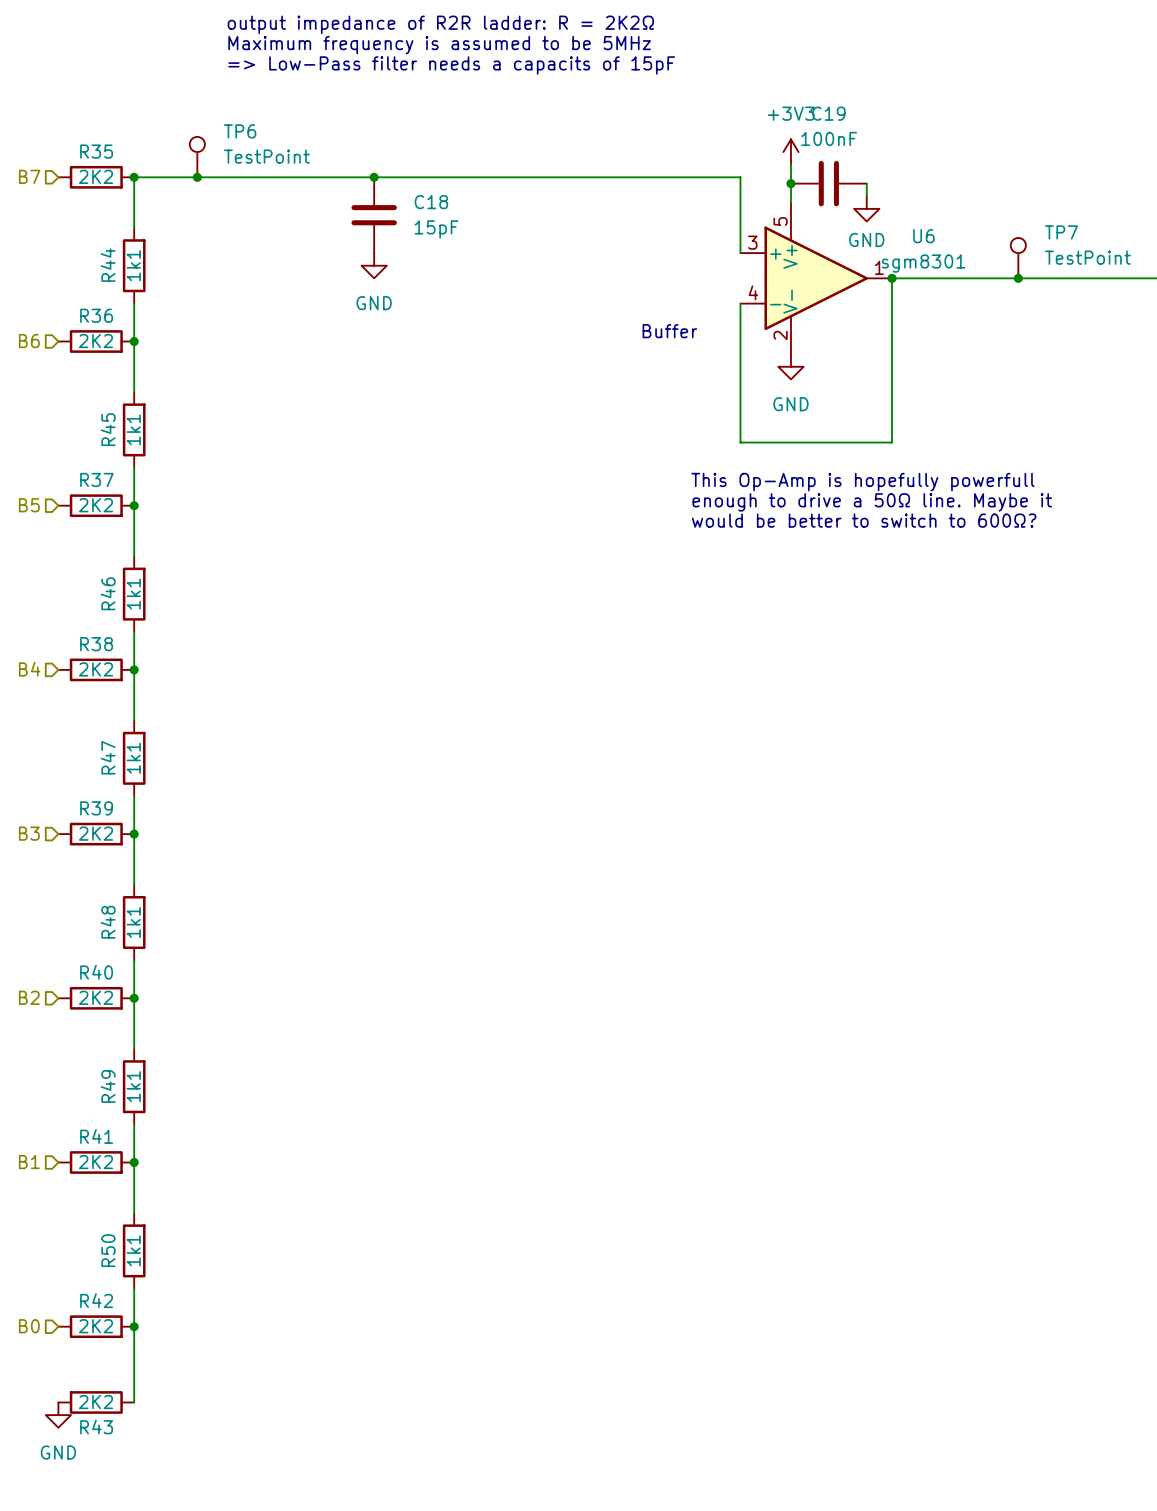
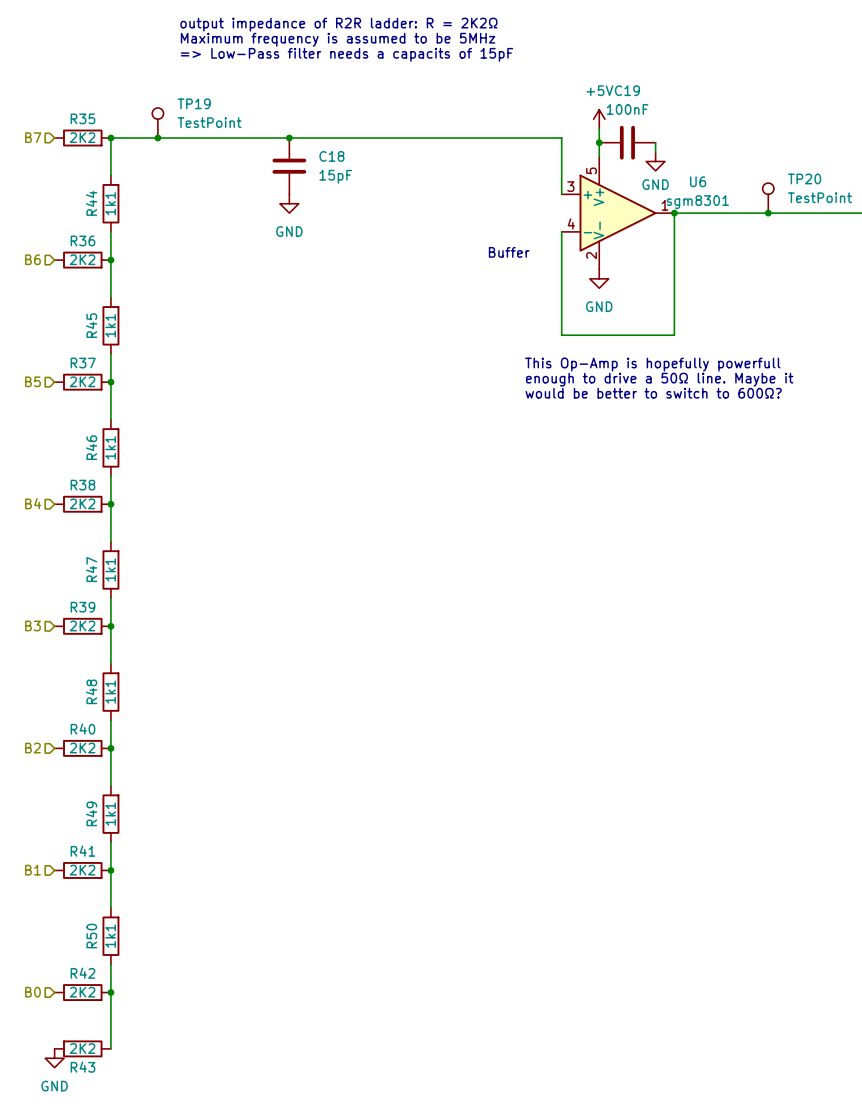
TP6 name: TP6 (240, 131) -> TP19 (194, 103)
power symbol: +3V3 (790, 152) -> +5V (599, 119)
TP7 name: TP7 (1061, 232) -> TP20 (804, 178)

